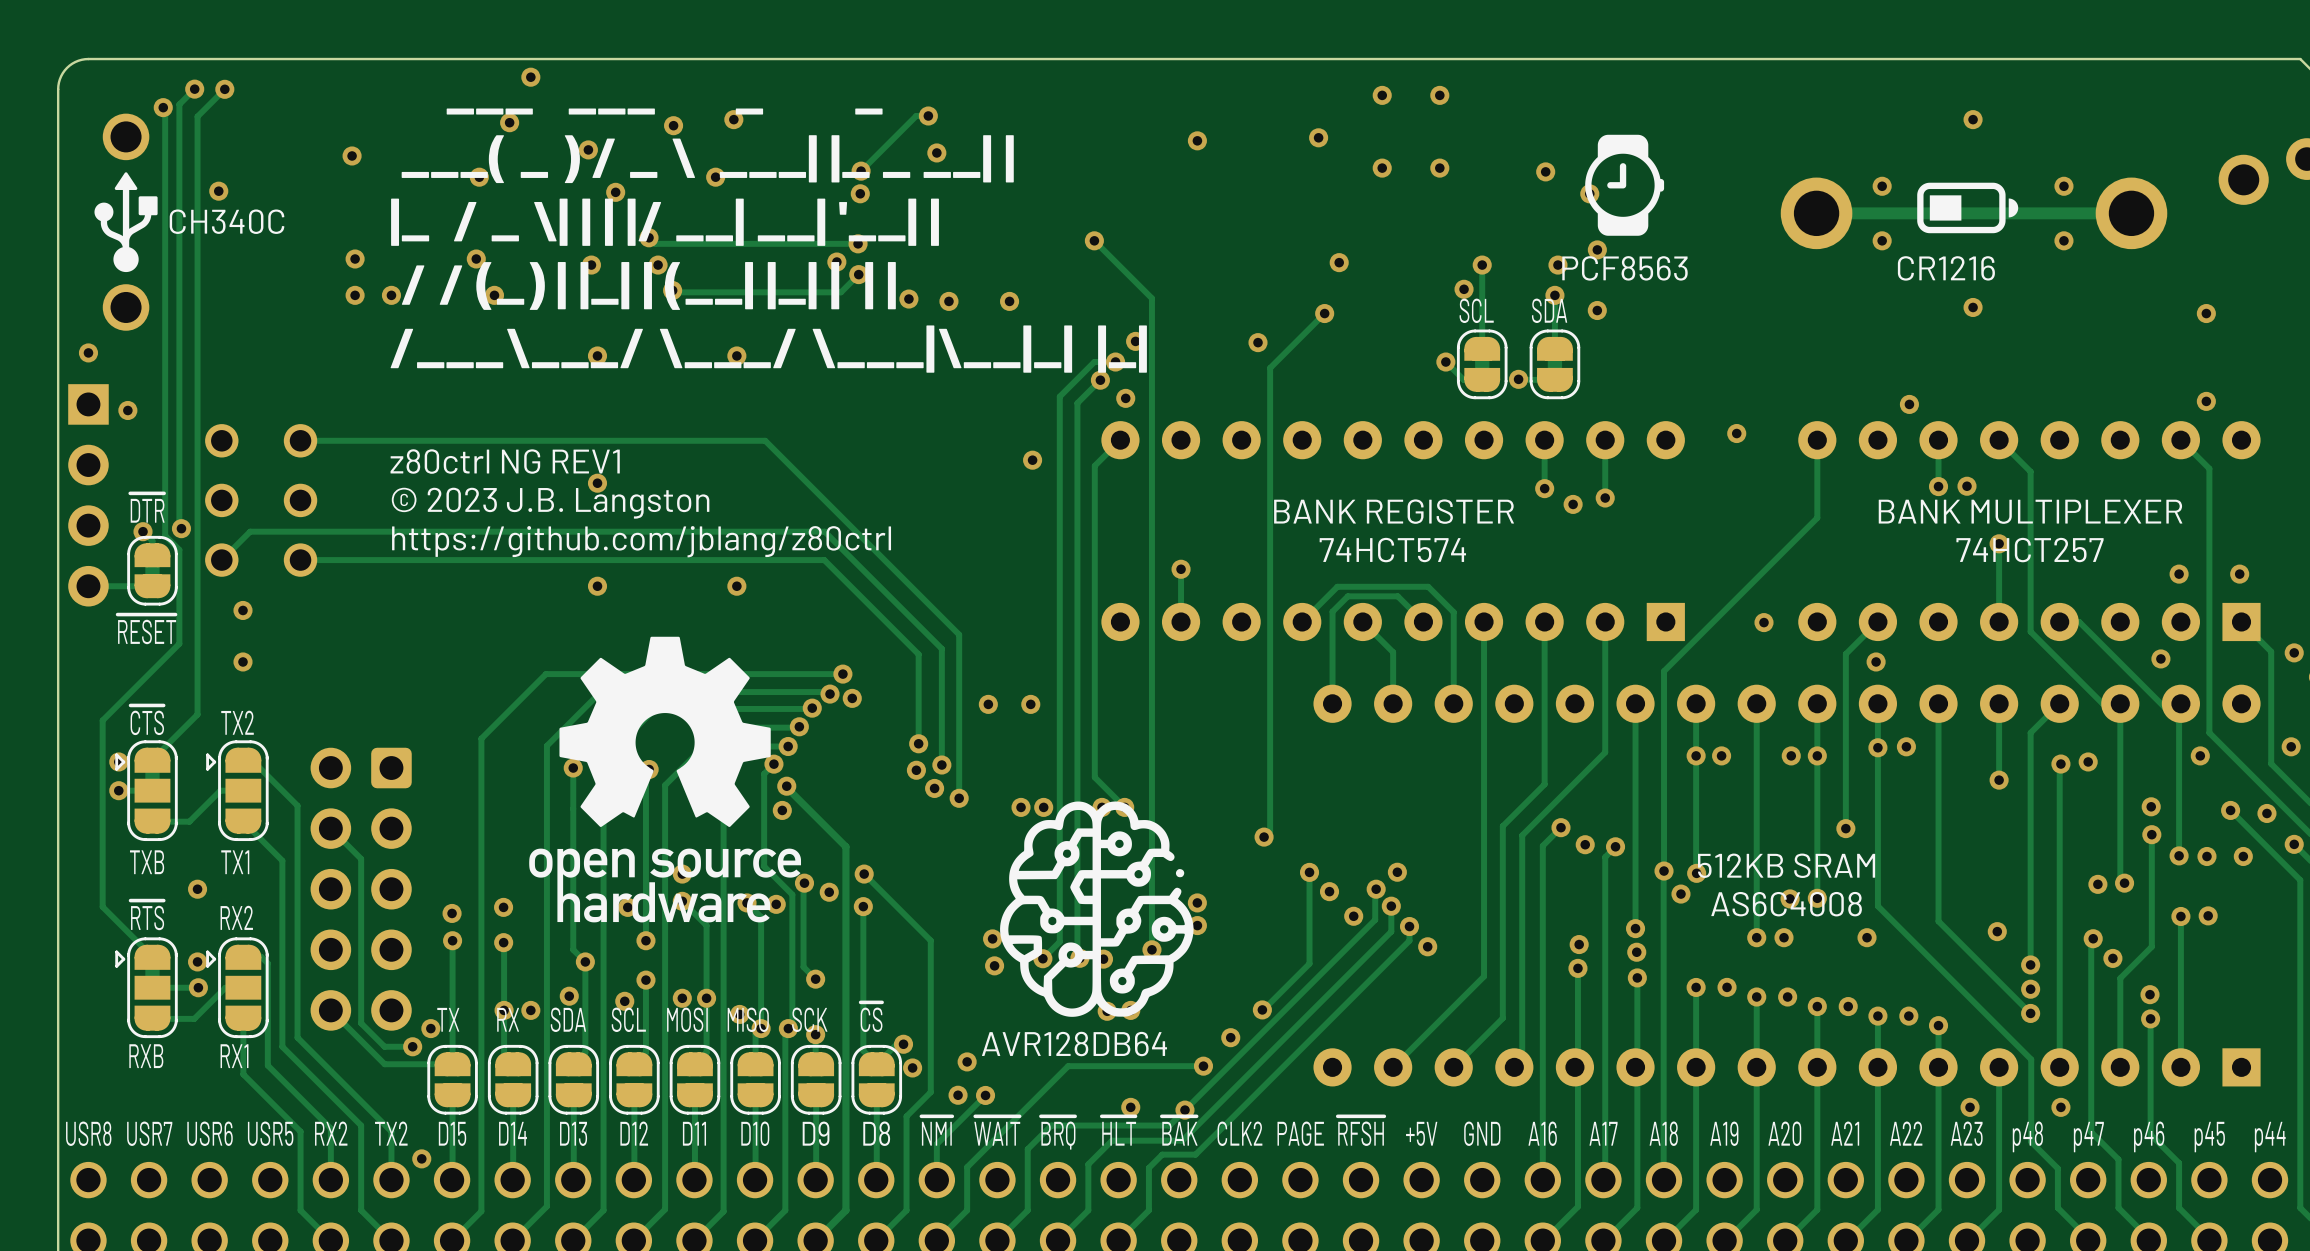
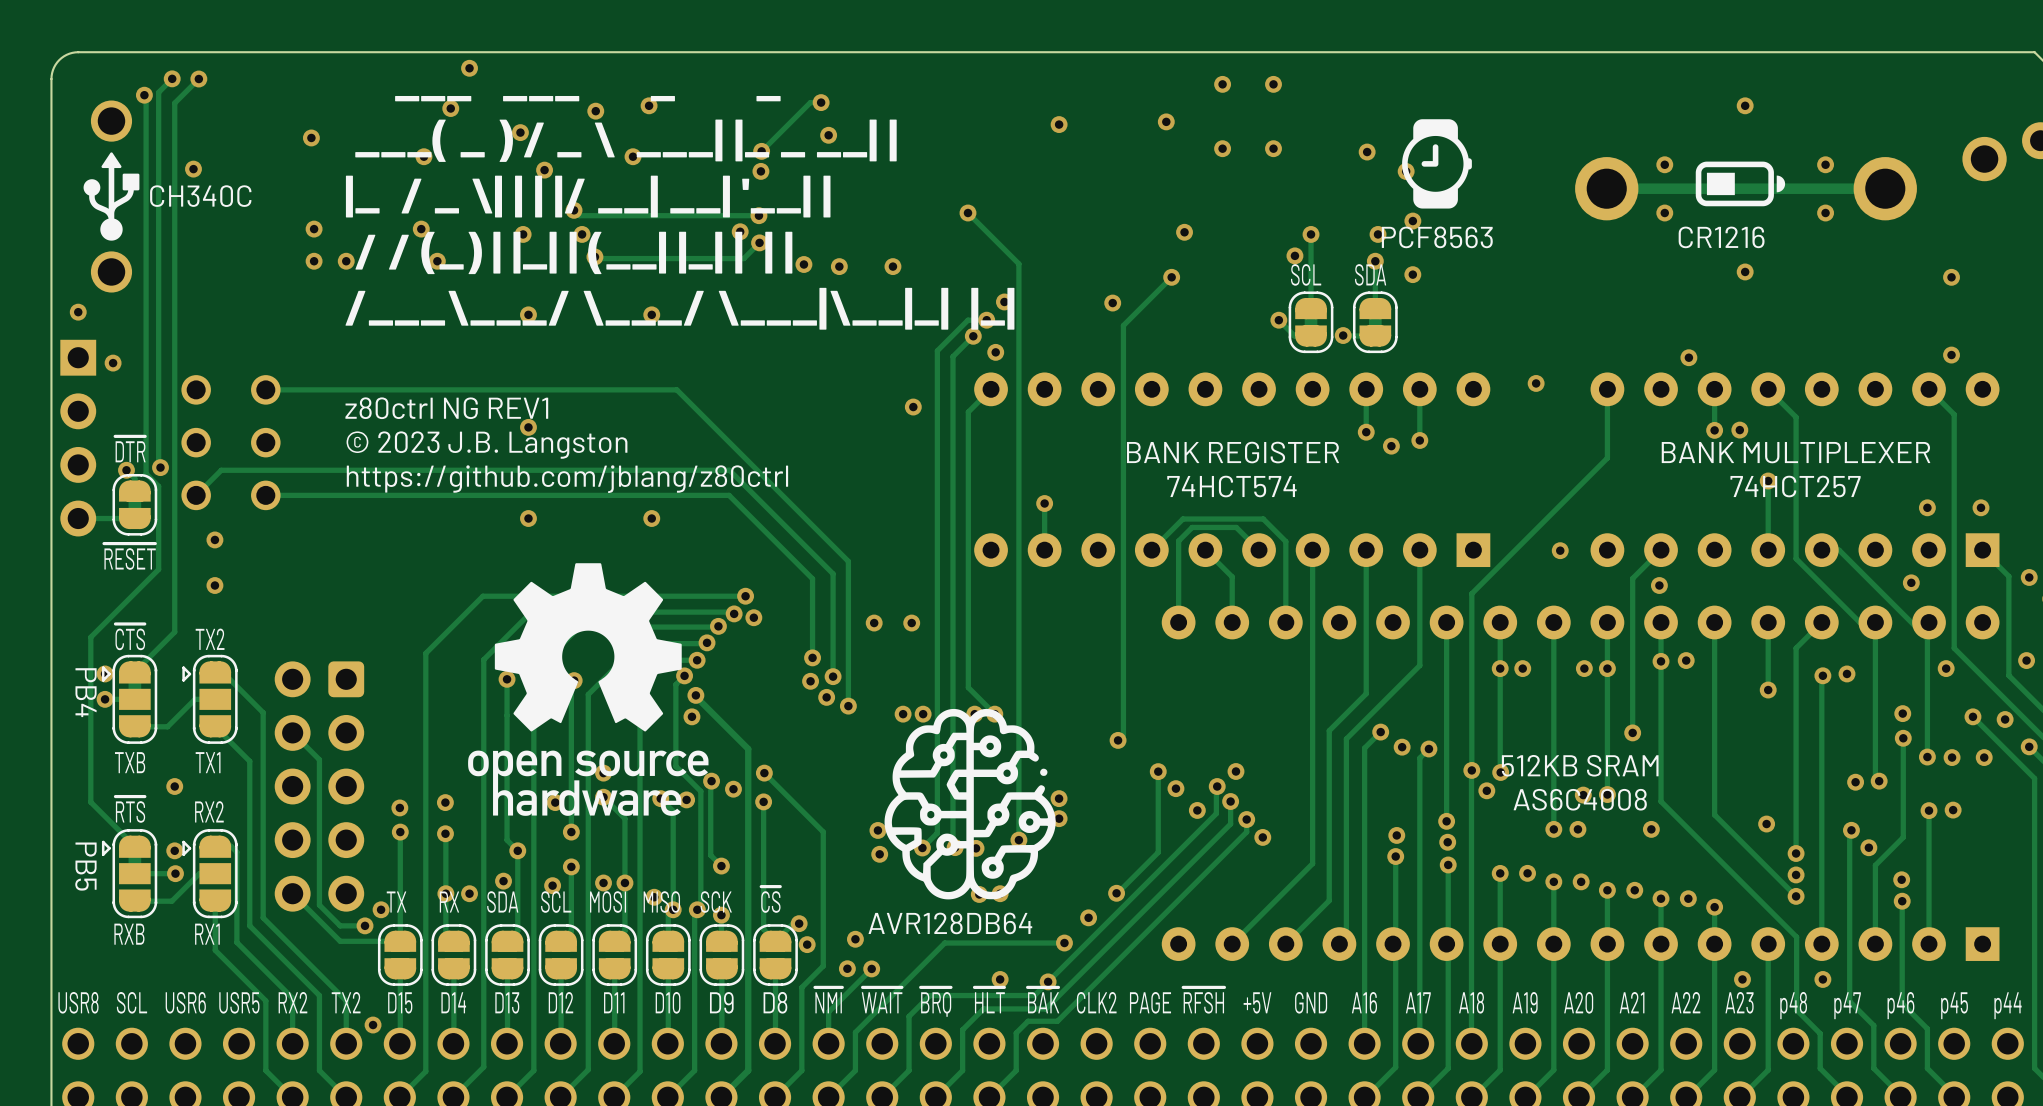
text: none -> PB4 (86, 692)
text: none -> PB5 (85, 866)
part text: USR7 (149, 1133) -> SCL (132, 1002)

